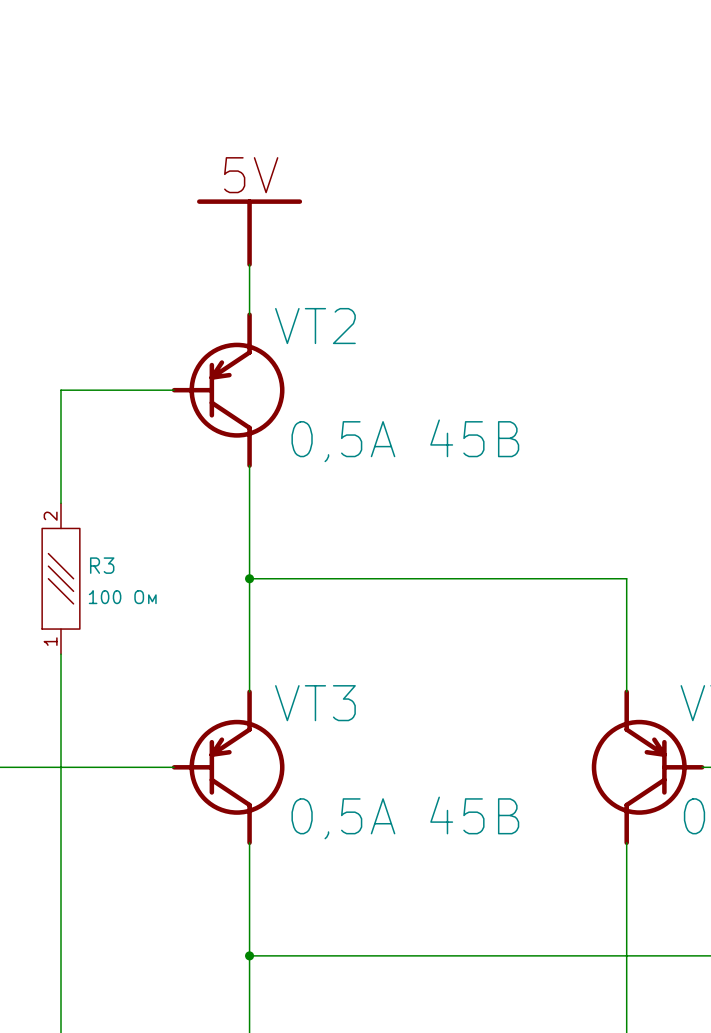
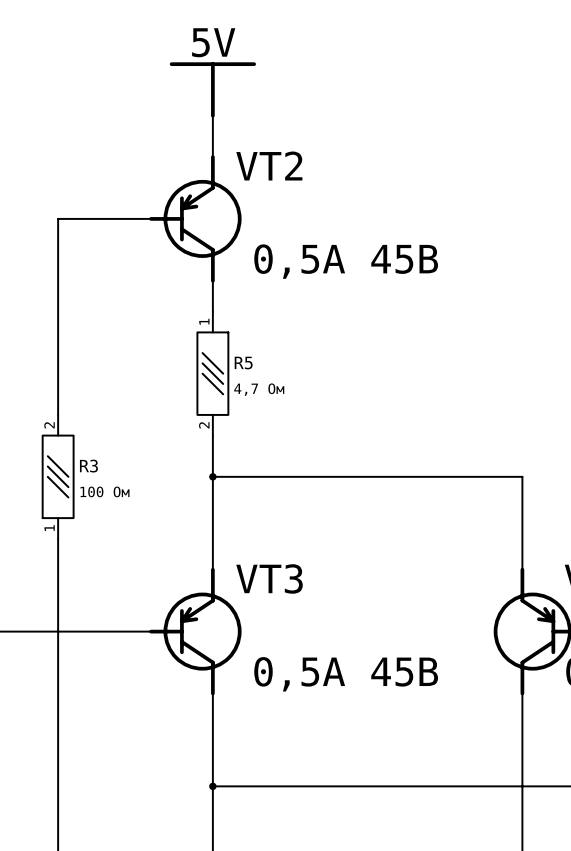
power symbol position: (249, 233) -> (212, 89)
wire: (249, 264) (249, 314) -> (212, 115) (212, 157)
wire: none -> (212, 280) (212, 311)
wire: (60, 390) (174, 390) -> (58, 322) (58, 218) (150, 218)
VT2 position: (228, 390) -> (195, 218)
R5: none -> (212, 373)
wire: (249, 465) (249, 528) -> none

